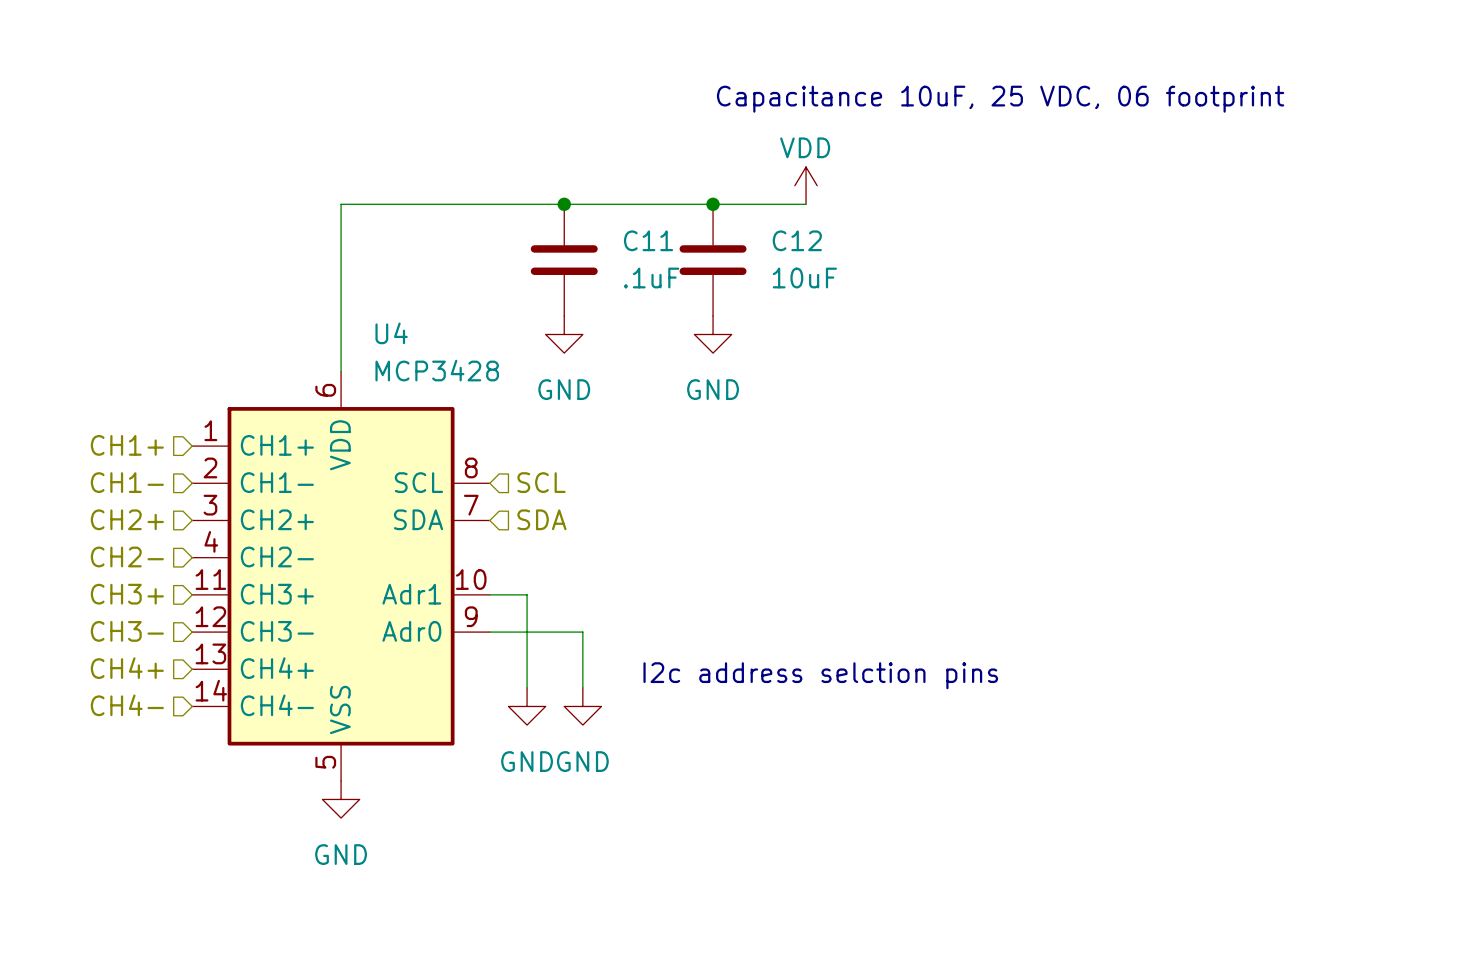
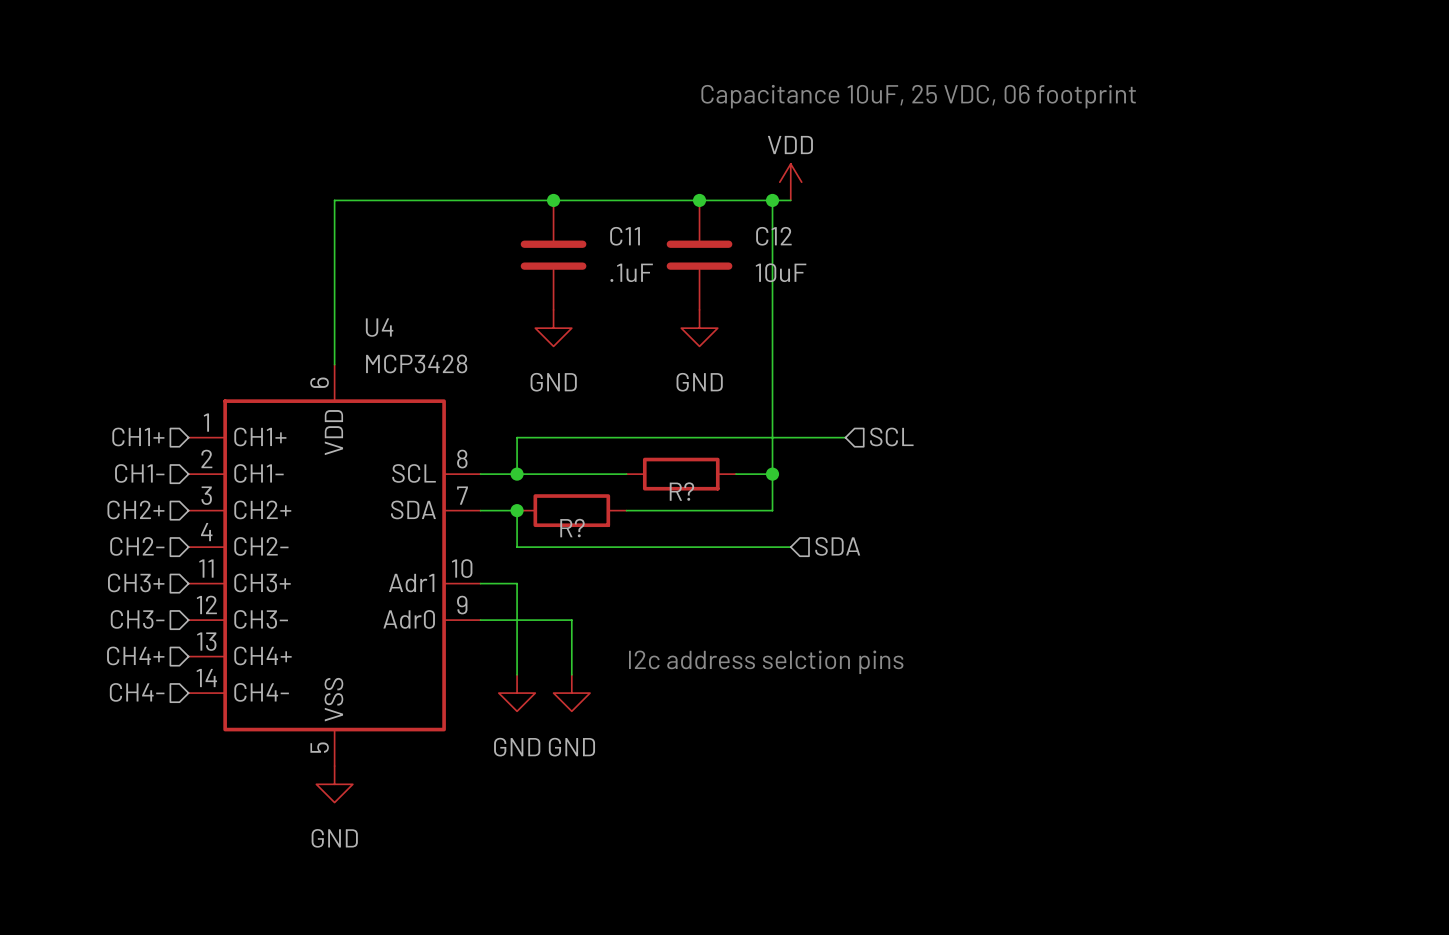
wire: none -> (772, 200) (772, 510) (626, 510)
junction: none -> (772, 200)
hierarchical label: none -> SCL (891, 436)
wire: none -> (845, 437) (517, 437) (517, 474)
hierarchical label: SCL (541, 482) -> none
wire: none -> (480, 474) (626, 474)
junction: none -> (517, 474)
R?: none -> (681, 474)
wire: none -> (736, 474) (772, 474)
junction: none -> (772, 474)
hierarchical label position: SDA (541, 519) -> SDA (837, 546)
wire: none -> (480, 510) (517, 510) (517, 547) (790, 547)
junction: none -> (517, 510)
R?: none -> (571, 510)

